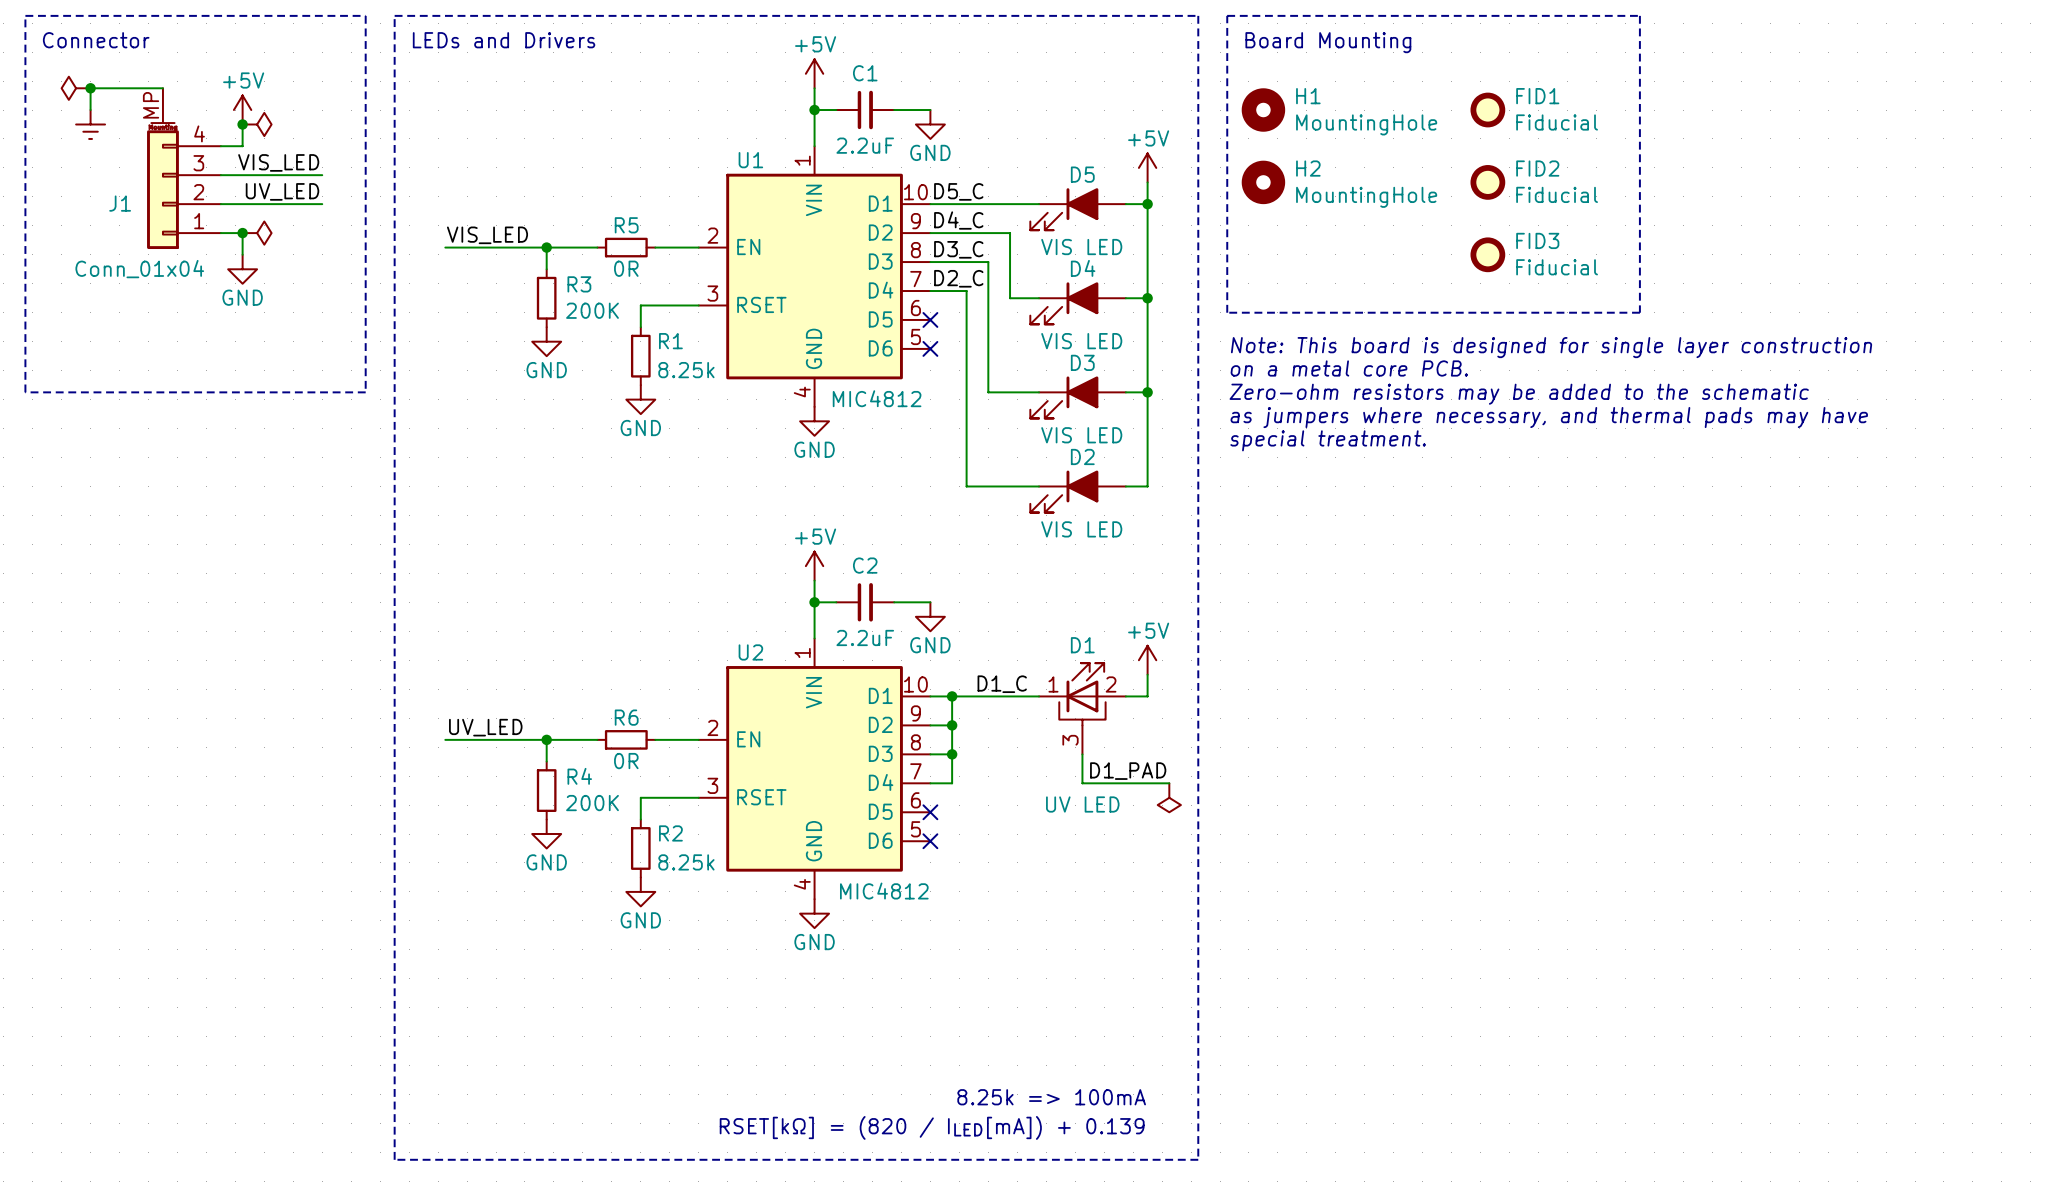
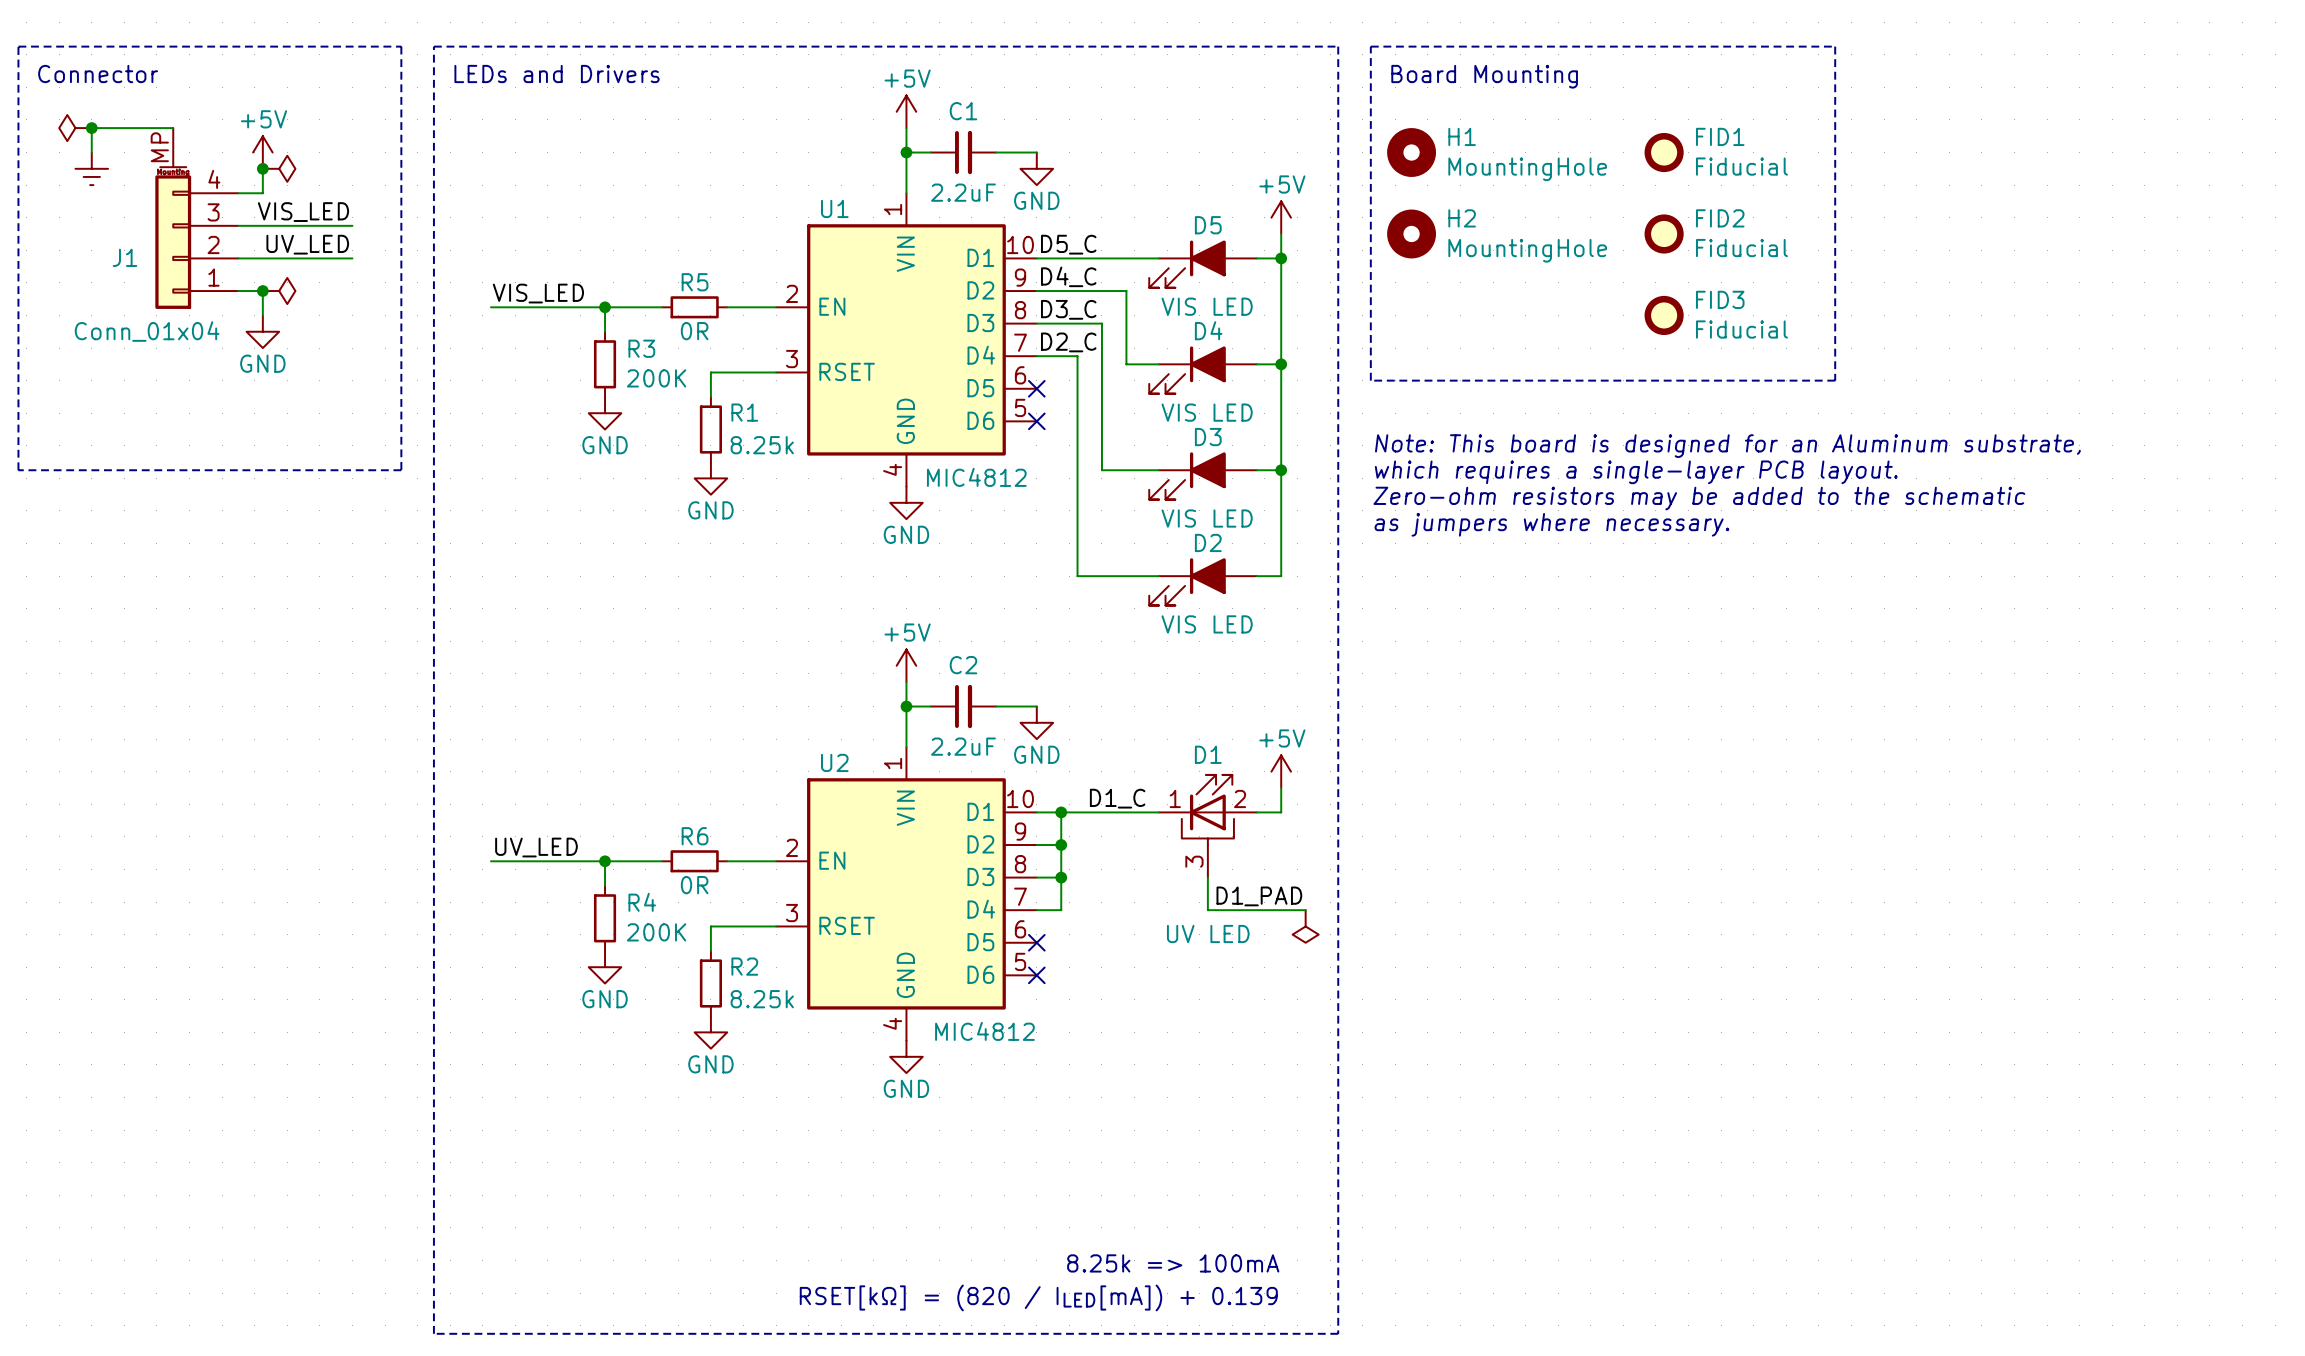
text: Note: This board is designed for single layer construction (1551, 347) -> none
text: on a metal core PCB. (1349, 368) -> Note: This board is designed for an Aluminum substrate, (1727, 446)
text: Zero-ohm resistors may be added to the schematic (1519, 394) -> which requires a single-layer PCB layout. (1636, 472)
text: as jumpers where necessary, and thermal pads may have (1549, 417) -> Zero-ohm resistors may be added to the schematic (1699, 498)
text: special treatment. (1328, 440) -> as jumpers where necessary. (1551, 524)

